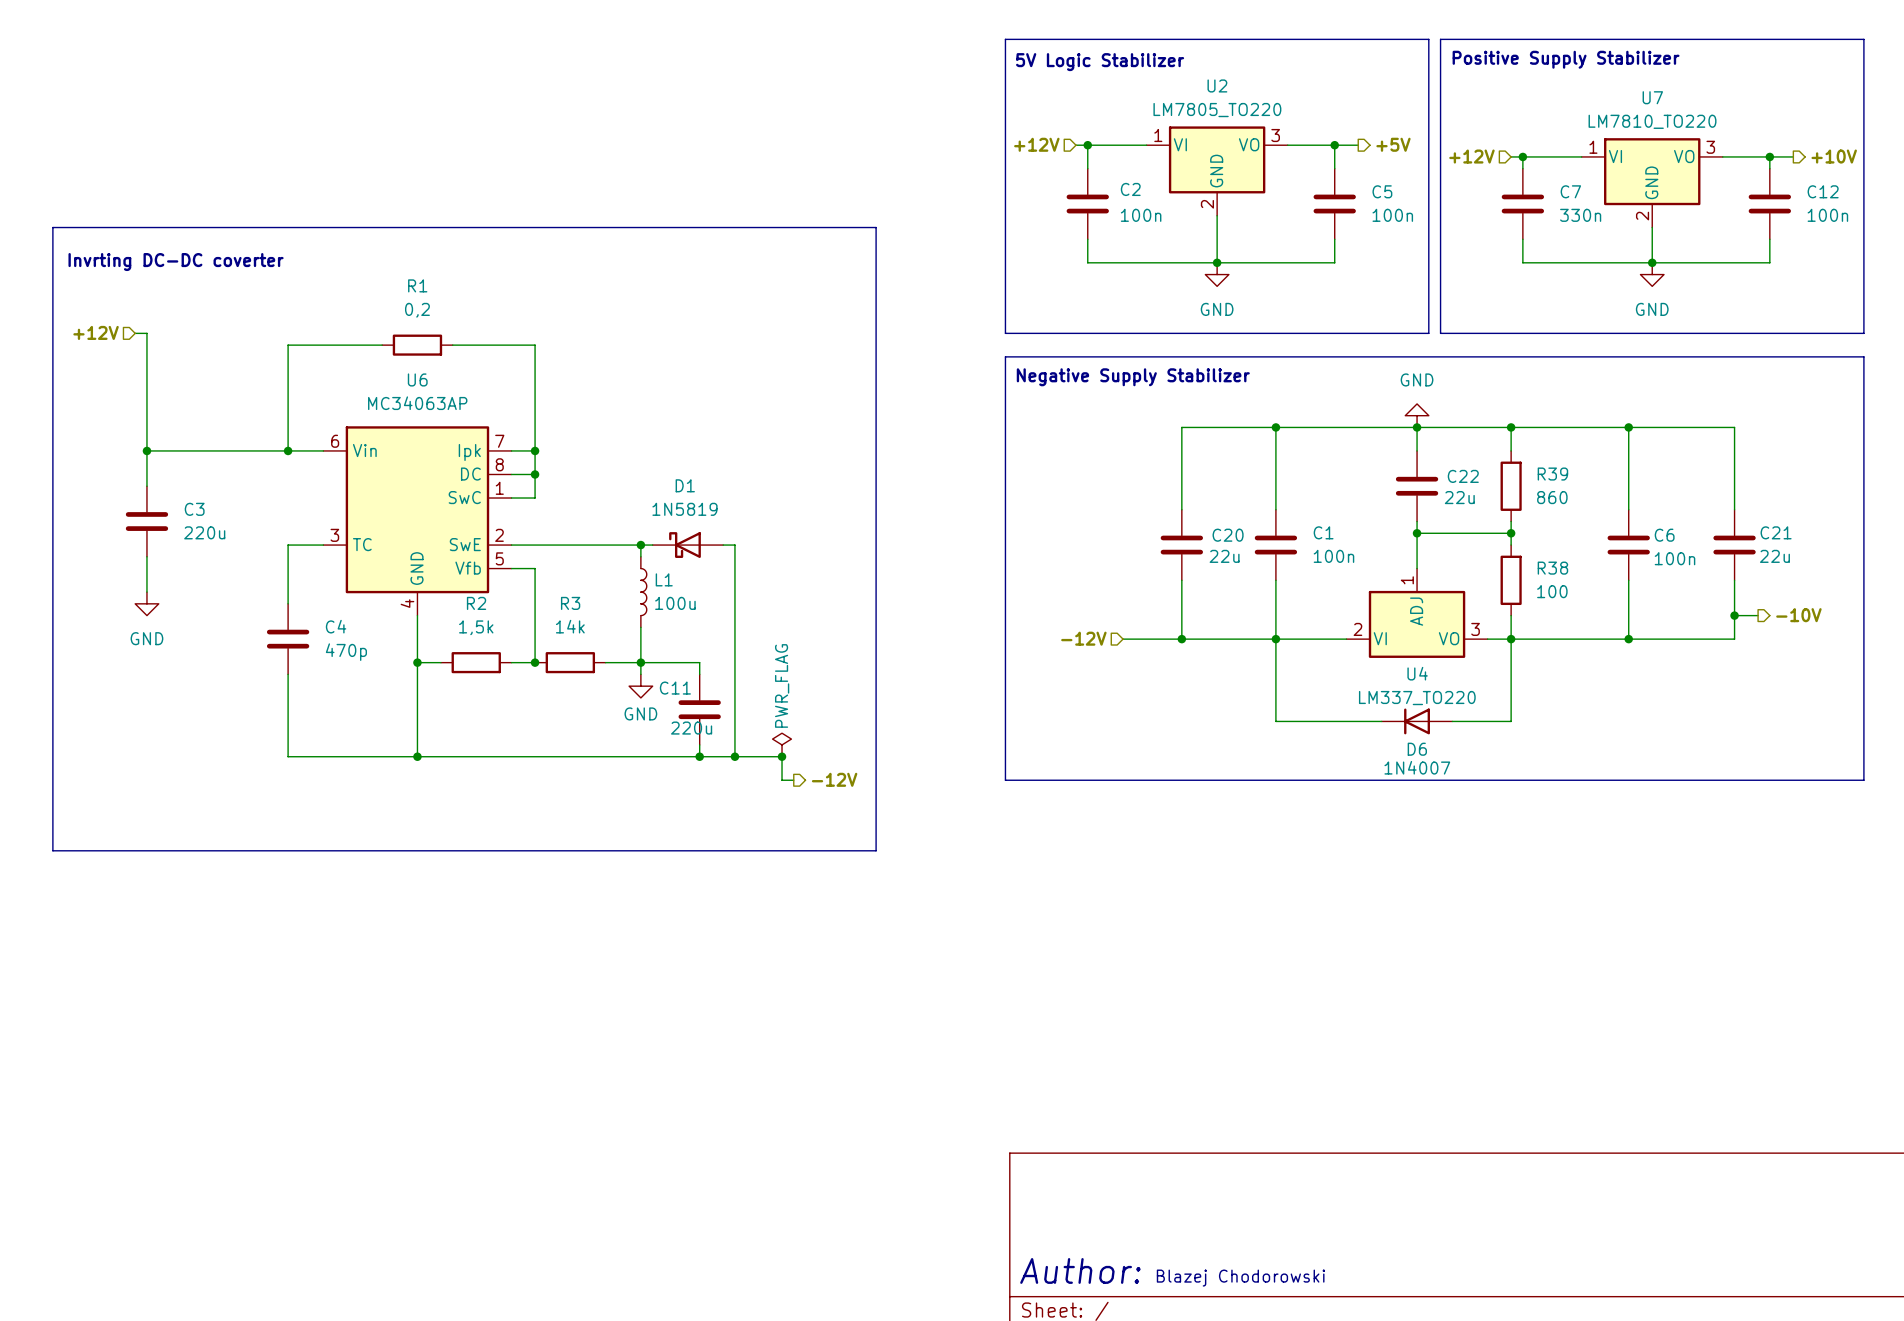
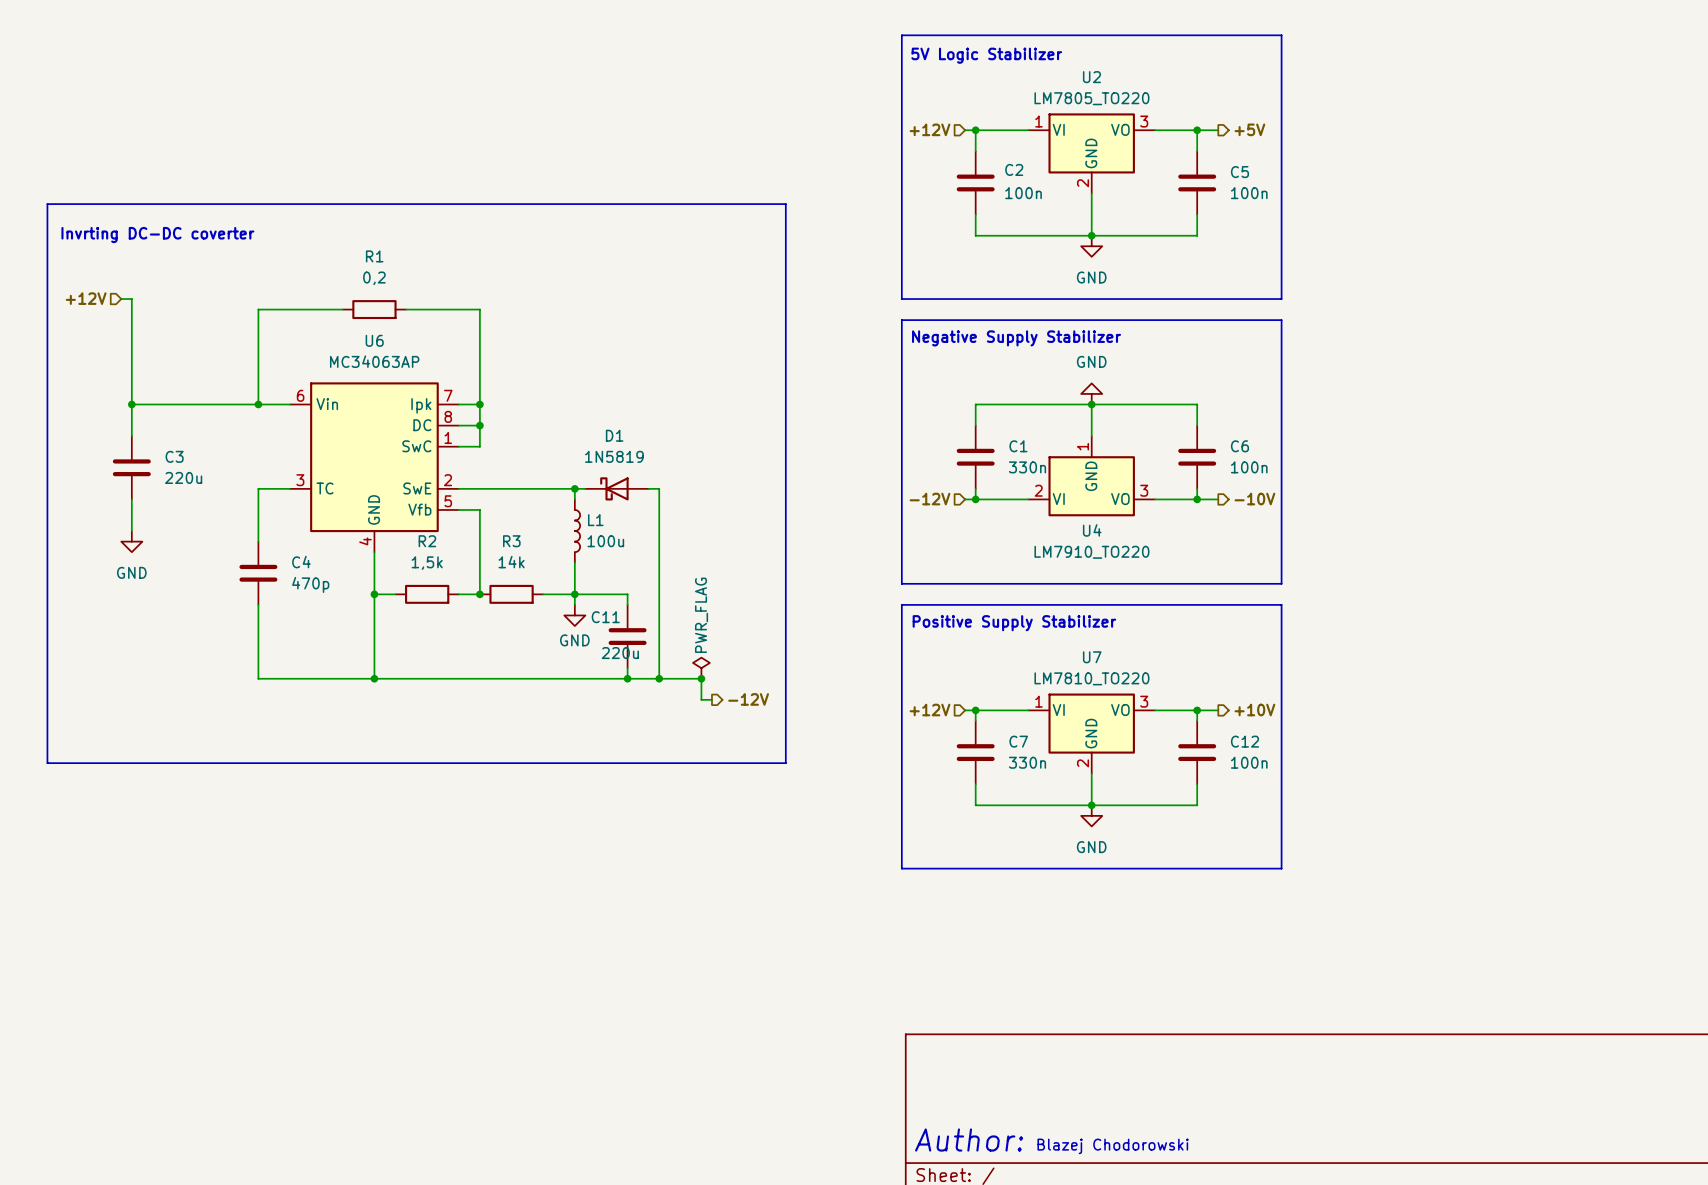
line: (1440, 39) (1863, 39) (1863, 333) (1440, 333) (1440, 39) -> none
text: Positive Supply Stabilizer (1566, 59) -> none
hierarchical label: +12V (1471, 156) -> none
wire: (1511, 156) (1581, 156) -> none
wire: (1522, 156) (1522, 168) -> none
junction: (1522, 156) -> none
wire: (1722, 156) (1793, 156) -> none
wire: (1769, 156) (1769, 168) -> none
junction: (1769, 156) -> none
hierarchical label: +10V (1834, 156) -> none
U7 position: (1652, 182) -> (1091, 733)
C7 position: (1522, 204) -> (975, 752)
C12 position: (1769, 204) -> (1197, 752)
wire: (1652, 227) (1652, 262) -> none
wire: (1522, 239) (1522, 262) (1769, 262) (1769, 239) -> none
junction: (1652, 262) -> none
power symbol: GND (1652, 274) -> none
line: (1428, 356) (1863, 356) (1863, 780) (1005, 780) -> (1281, 320) (1281, 583) (901, 583)
power symbol position: GND (1417, 415) -> GND (1091, 393)
wire: (1275, 427) (1275, 509) -> none
junction: (1275, 427) -> none
wire: (1417, 427) (1417, 450) -> none
junction: (1417, 427) -> none
wire: (1511, 427) (1511, 450) -> none
junction: (1511, 427) -> none
wire: (1628, 427) (1628, 509) -> none
junction: (1628, 427) -> none
wire: none -> (1091, 404) (1091, 436)
junction: none -> (1091, 404)
wire: none -> (975, 425) (975, 404) (1197, 404) (1197, 425)
C22: 22u (1417, 486) -> none
R39: 860 (1511, 486) -> none
wire: (1181, 509) (1181, 427) (1734, 427) (1734, 509) -> none
wire: (1417, 521) (1417, 568) -> none
wire: (1511, 521) (1511, 545) -> none
wire: (1417, 533) (1511, 533) -> none
junction: (1417, 533) -> none
junction: (1511, 533) -> none
C6 name position: C6 (1664, 535) -> C6 (1239, 446)
wire: none -> (975, 488) (975, 499)
C20: 22u (1181, 545) -> none
C1 position: (1275, 545) -> (975, 457)
wire: none -> (1197, 488) (1197, 499)
C6 position: (1628, 545) -> (1197, 457)
C21: 22u (1734, 545) -> none
wire: none -> (965, 499) (1028, 499)
junction: none -> (975, 499)
wire: none -> (1155, 499) (1218, 499)
C1 value: 100n (1333, 556) -> 330n (1027, 467)
junction: none -> (1197, 499)
hierarchical label: none -> -10V (1254, 499)
C6 value position: 100n (1675, 558) -> 100n (1249, 467)
wire: (1181, 580) (1181, 639) -> none
wire: (1275, 580) (1275, 721) (1381, 721) -> none
R38: 100 (1511, 580) -> none
wire: (1628, 580) (1628, 639) -> none
wire: (1734, 580) (1734, 639) (1487, 639) -> none
U4 pin name: ADJ (1416, 611) -> GND (1091, 476)
U4 position: (1417, 613) -> (1091, 476)
wire: (1511, 615) (1511, 721) (1452, 721) -> none
wire: (1734, 615) (1758, 615) -> none
junction: (1734, 615) -> none
hierarchical label: -10V (1798, 615) -> none
hierarchical label position: -12V (1083, 638) -> -12V (930, 499)
wire: (1123, 639) (1346, 639) -> none
junction: (1181, 639) -> none
junction: (1275, 639) -> none
junction: (1511, 639) -> none
junction: (1628, 639) -> none
line: (1005, 650) (1005, 674) -> (901, 699) (901, 868) (1281, 868) (1281, 604) (901, 604)
text: none -> Positive Supply Stabilizer (1014, 623)
U4 value: LM337_TO220 (1417, 698) -> LM7910_TO220 (1091, 552)
D6: 1N4007 (1417, 721) -> none
hierarchical label: none -> +12V (930, 710)
hierarchical label: none -> +10V (1254, 710)
wire: none -> (965, 710) (1028, 710)
wire: none -> (975, 710) (975, 720)
junction: none -> (975, 710)
wire: none -> (1155, 710) (1218, 710)
wire: none -> (1197, 710) (1197, 720)
junction: none -> (1197, 710)
wire: none -> (1091, 773) (1091, 805)
wire: none -> (975, 784) (975, 805) (1197, 805) (1197, 784)
junction: none -> (1091, 805)
power symbol: none -> GND (1091, 815)

